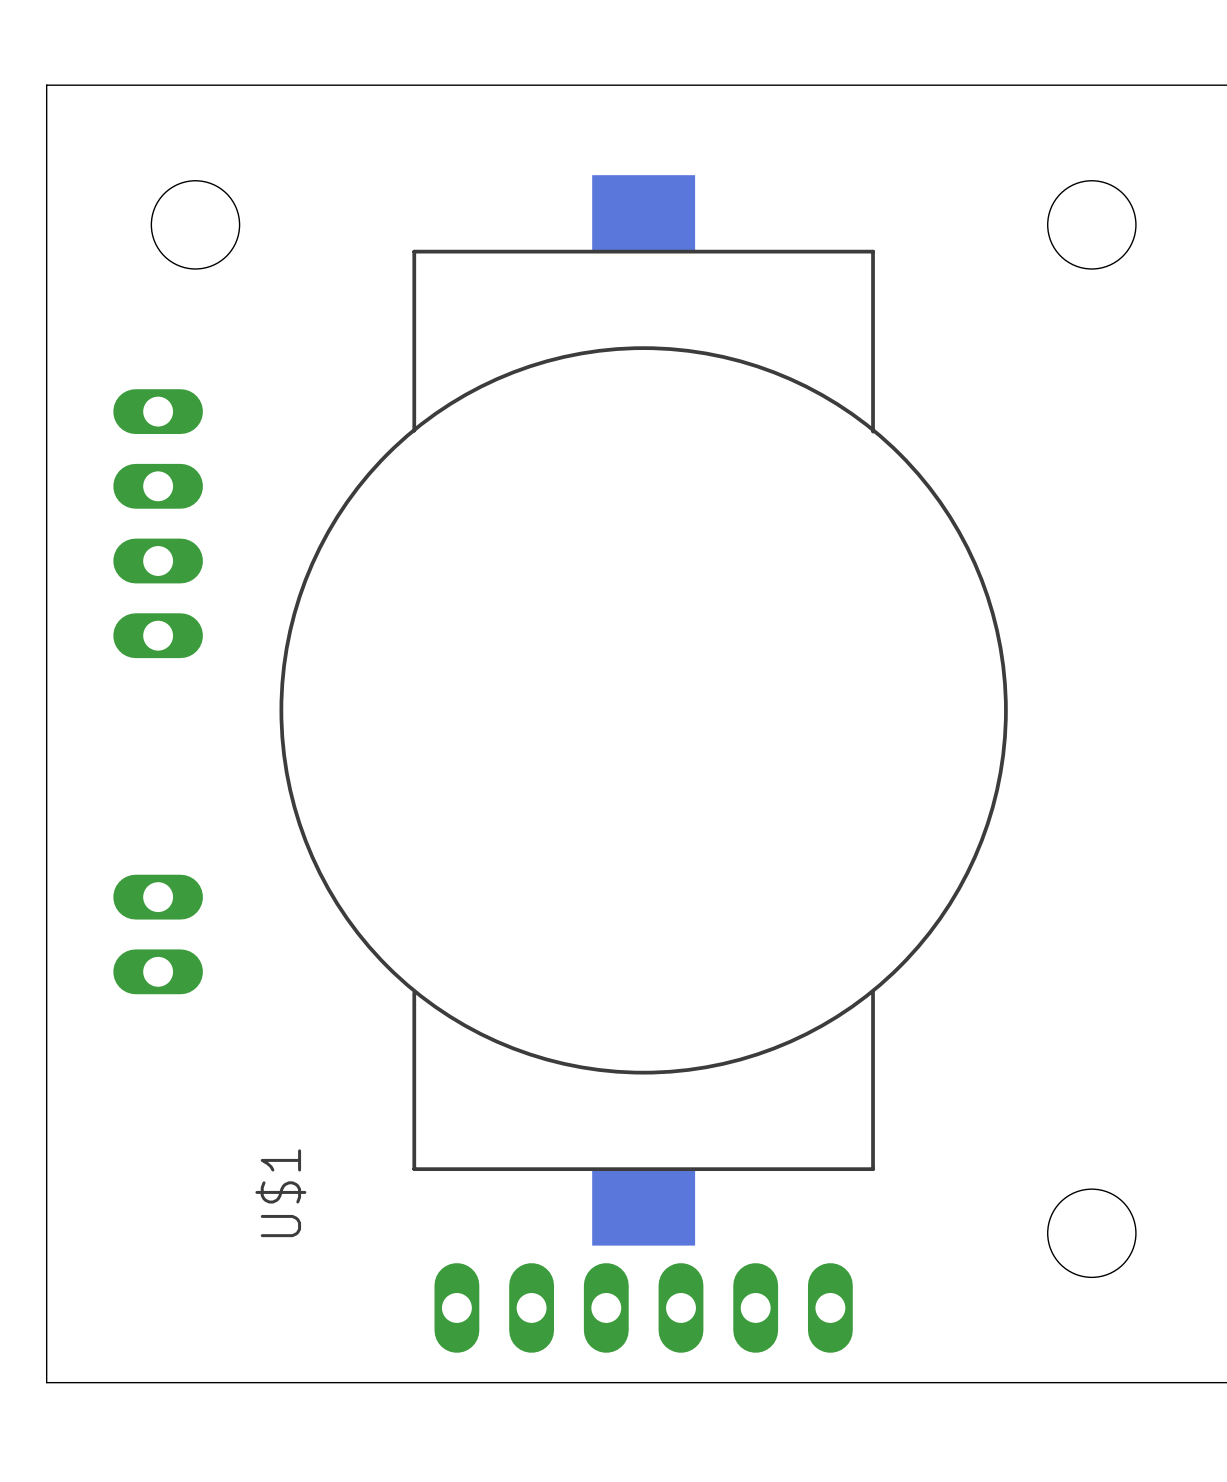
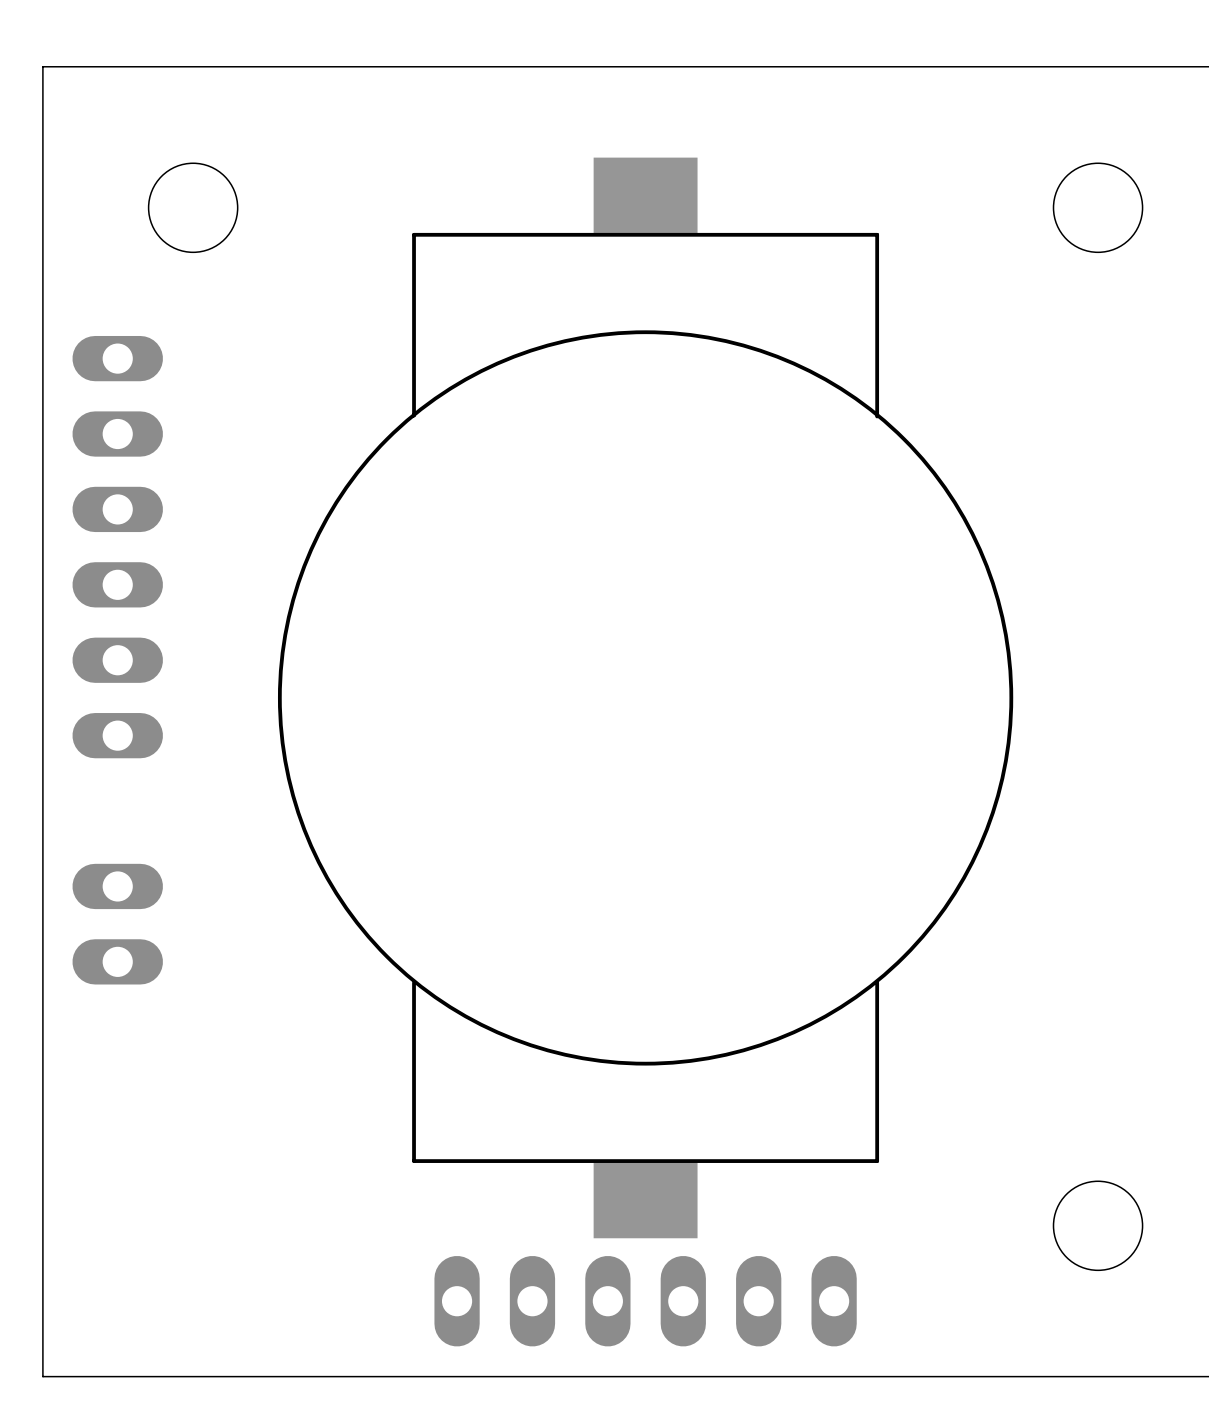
part: (158, 523) -> none
part: none -> (117, 547)
part position: (158, 934) -> (117, 924)
U$1 name: U$1 (280, 1193) -> none

